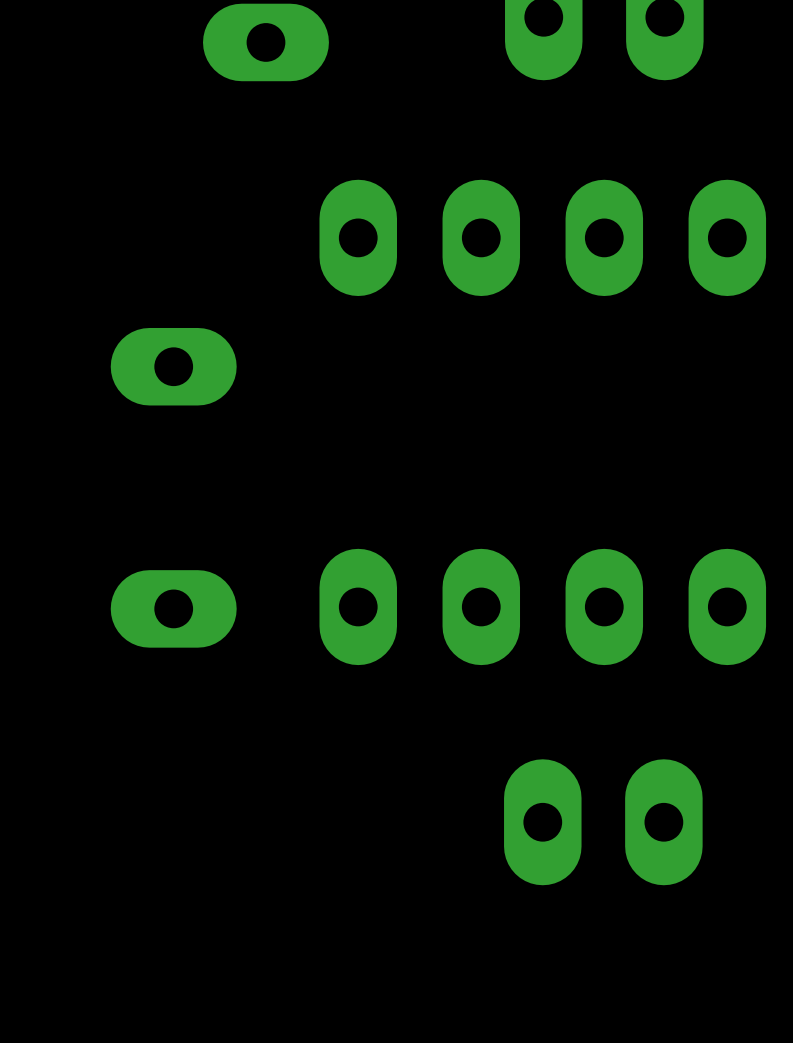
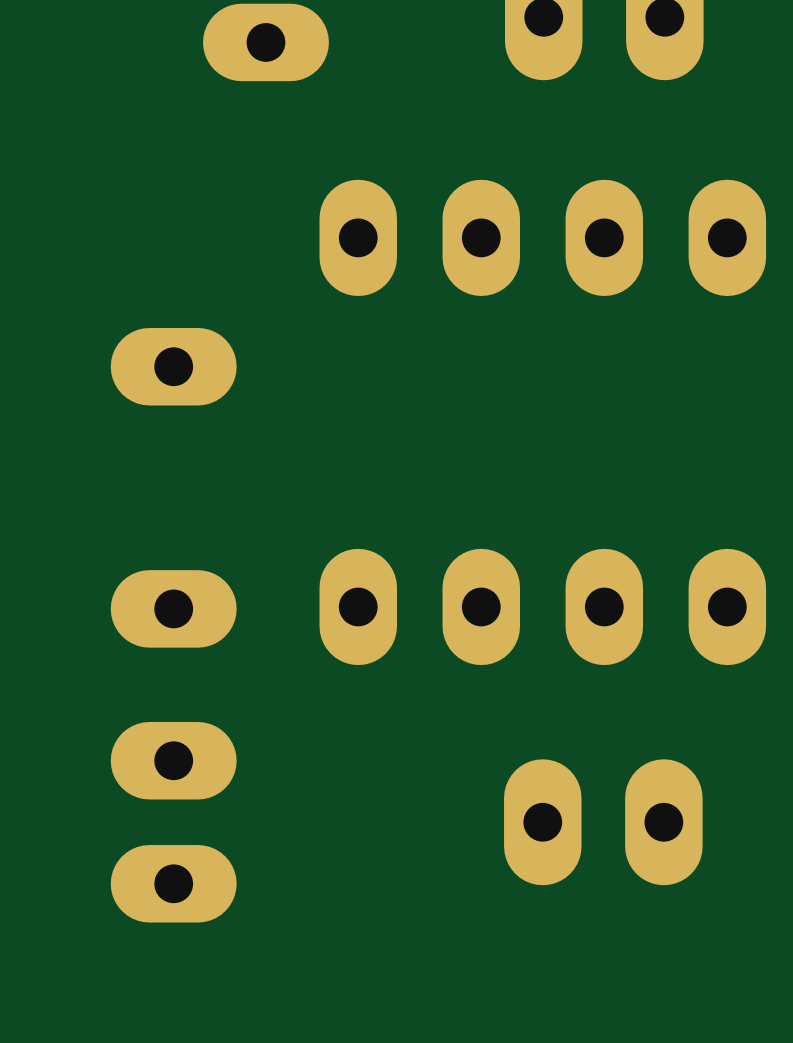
part: none -> (173, 822)

